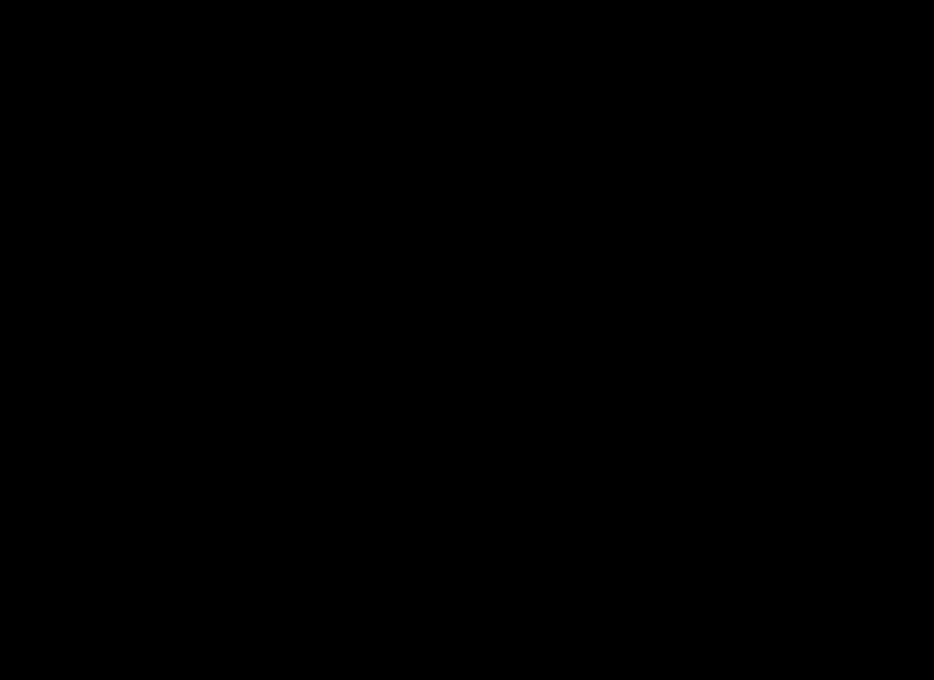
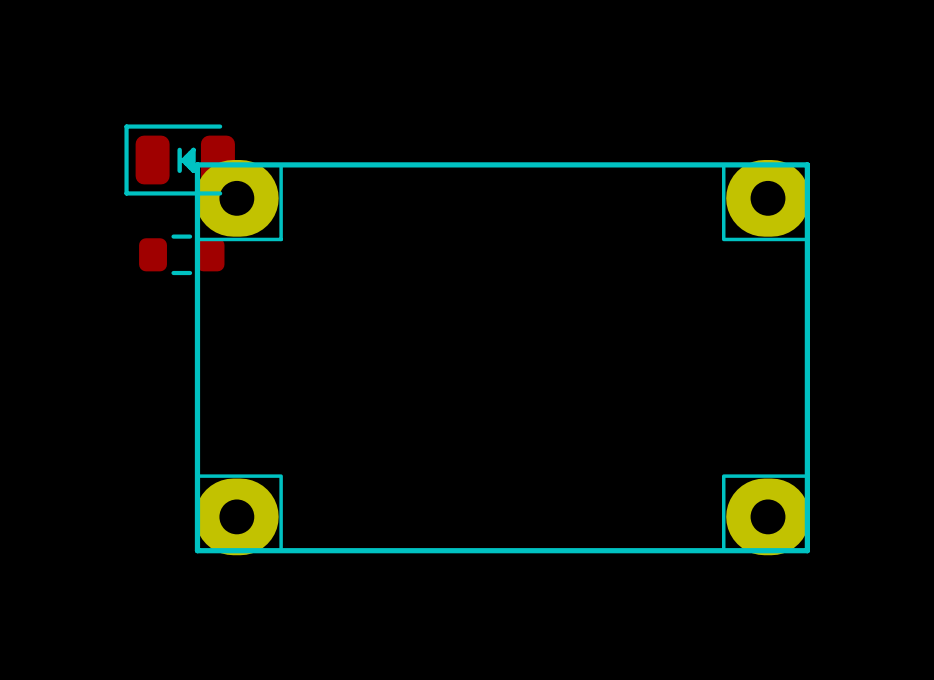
part: none -> (179, 160)
part: none -> (181, 254)
part: none -> (502, 357)

